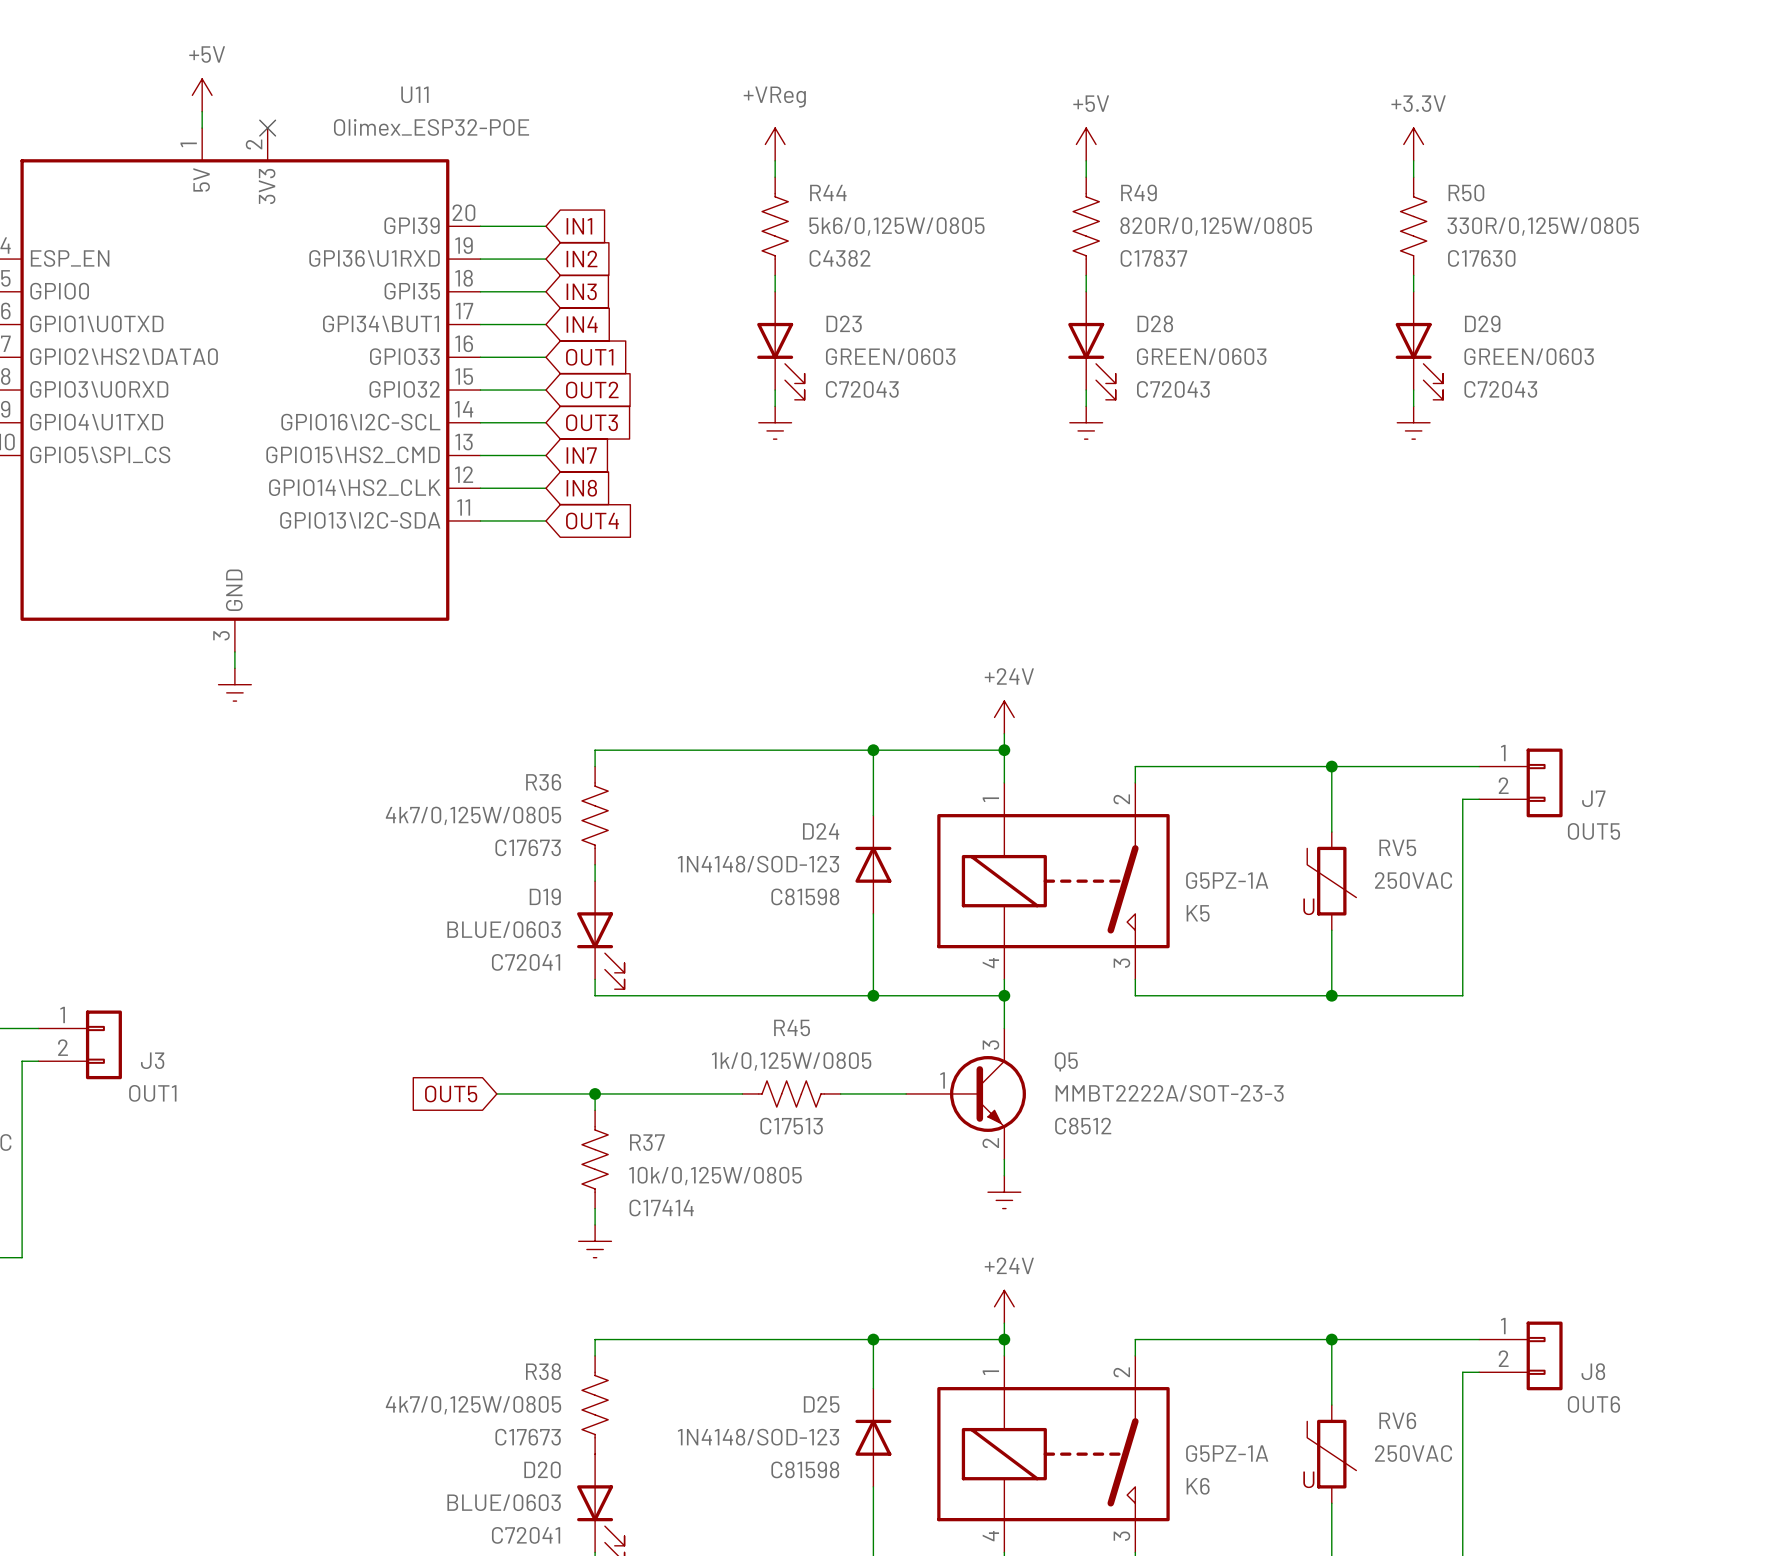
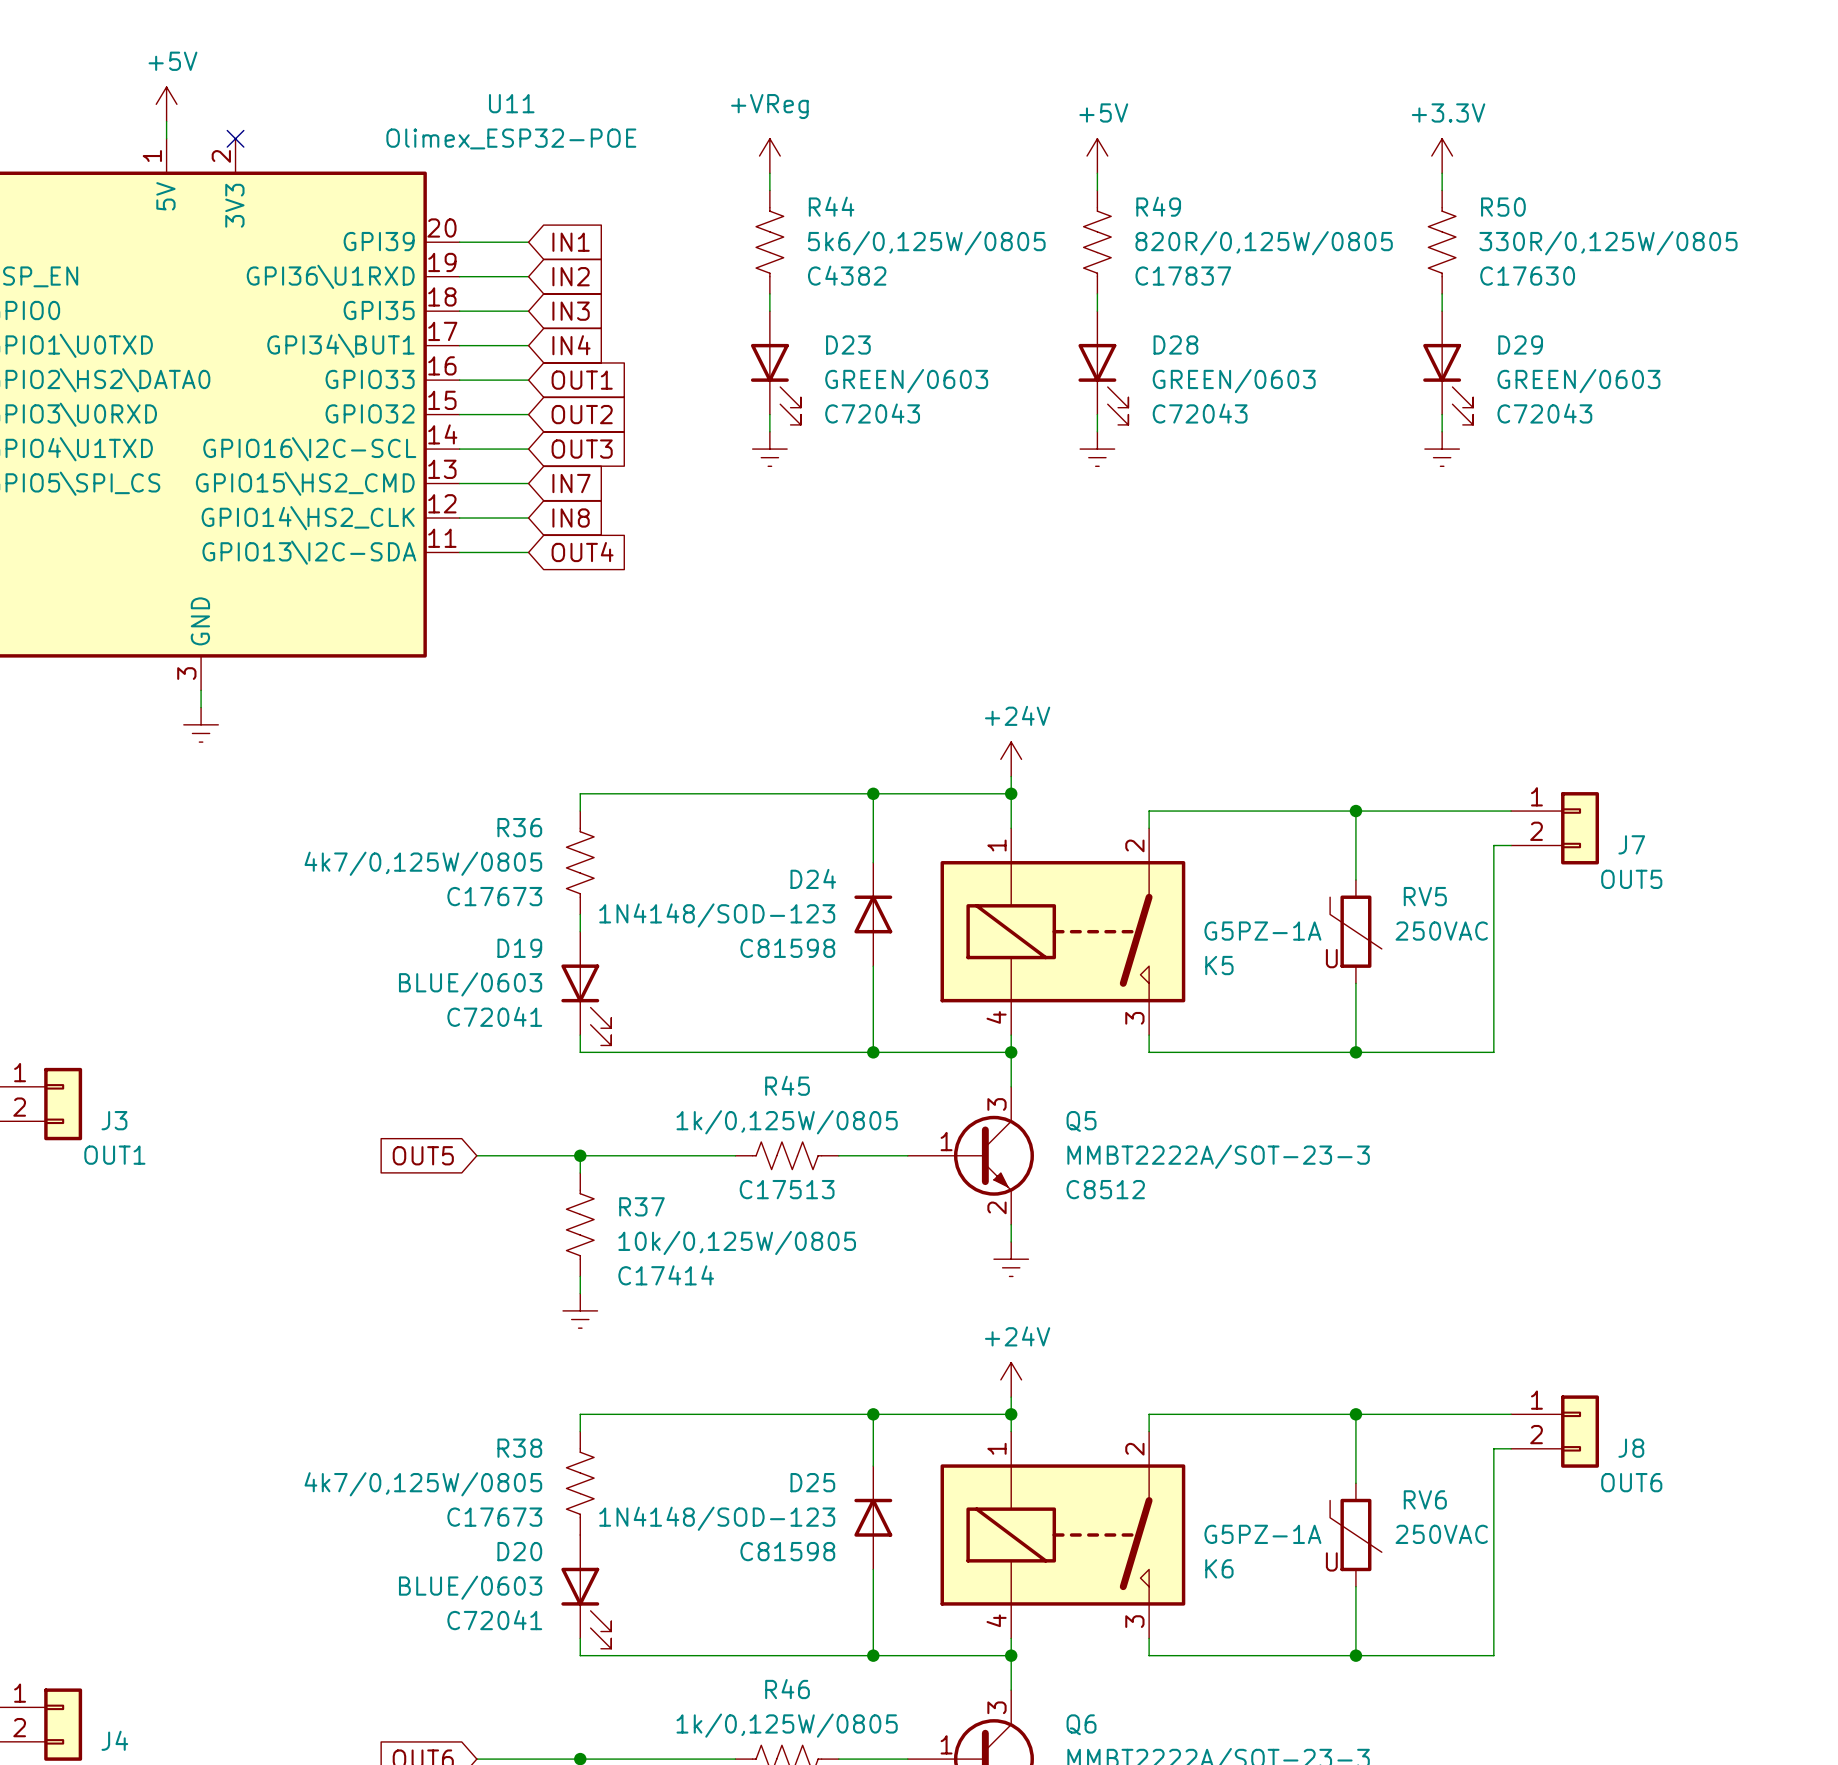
U11 name position: U11 (414, 94) -> U11 (511, 103)
U11 value position: Olimex_ESP32-POE (431, 127) -> Olimex_ESP32-POE (511, 138)

